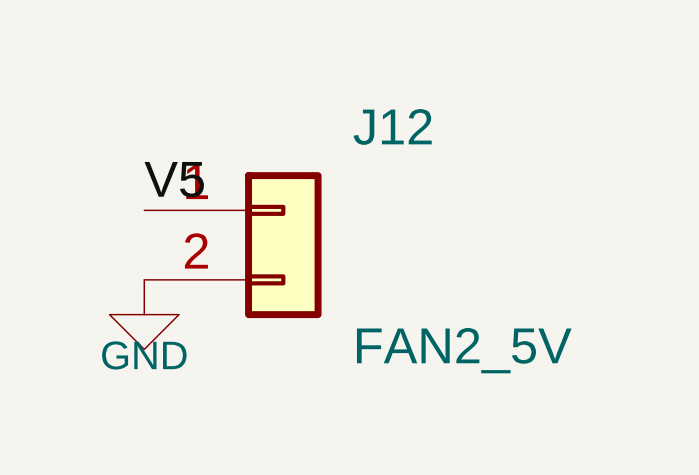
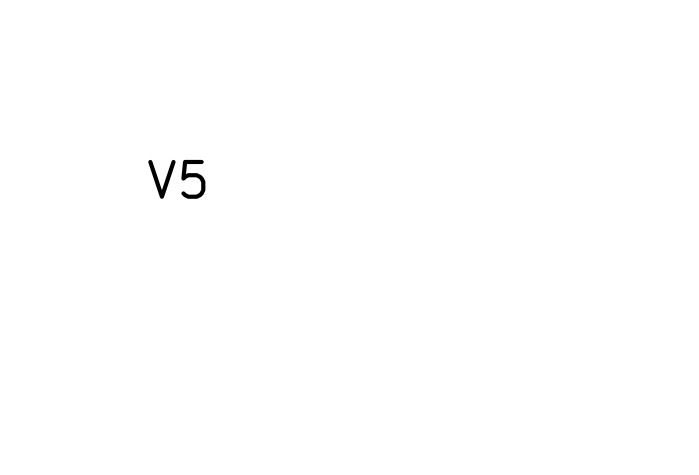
J12: FAN2_5V (232, 245) -> none
power symbol: GND (144, 314) -> none

